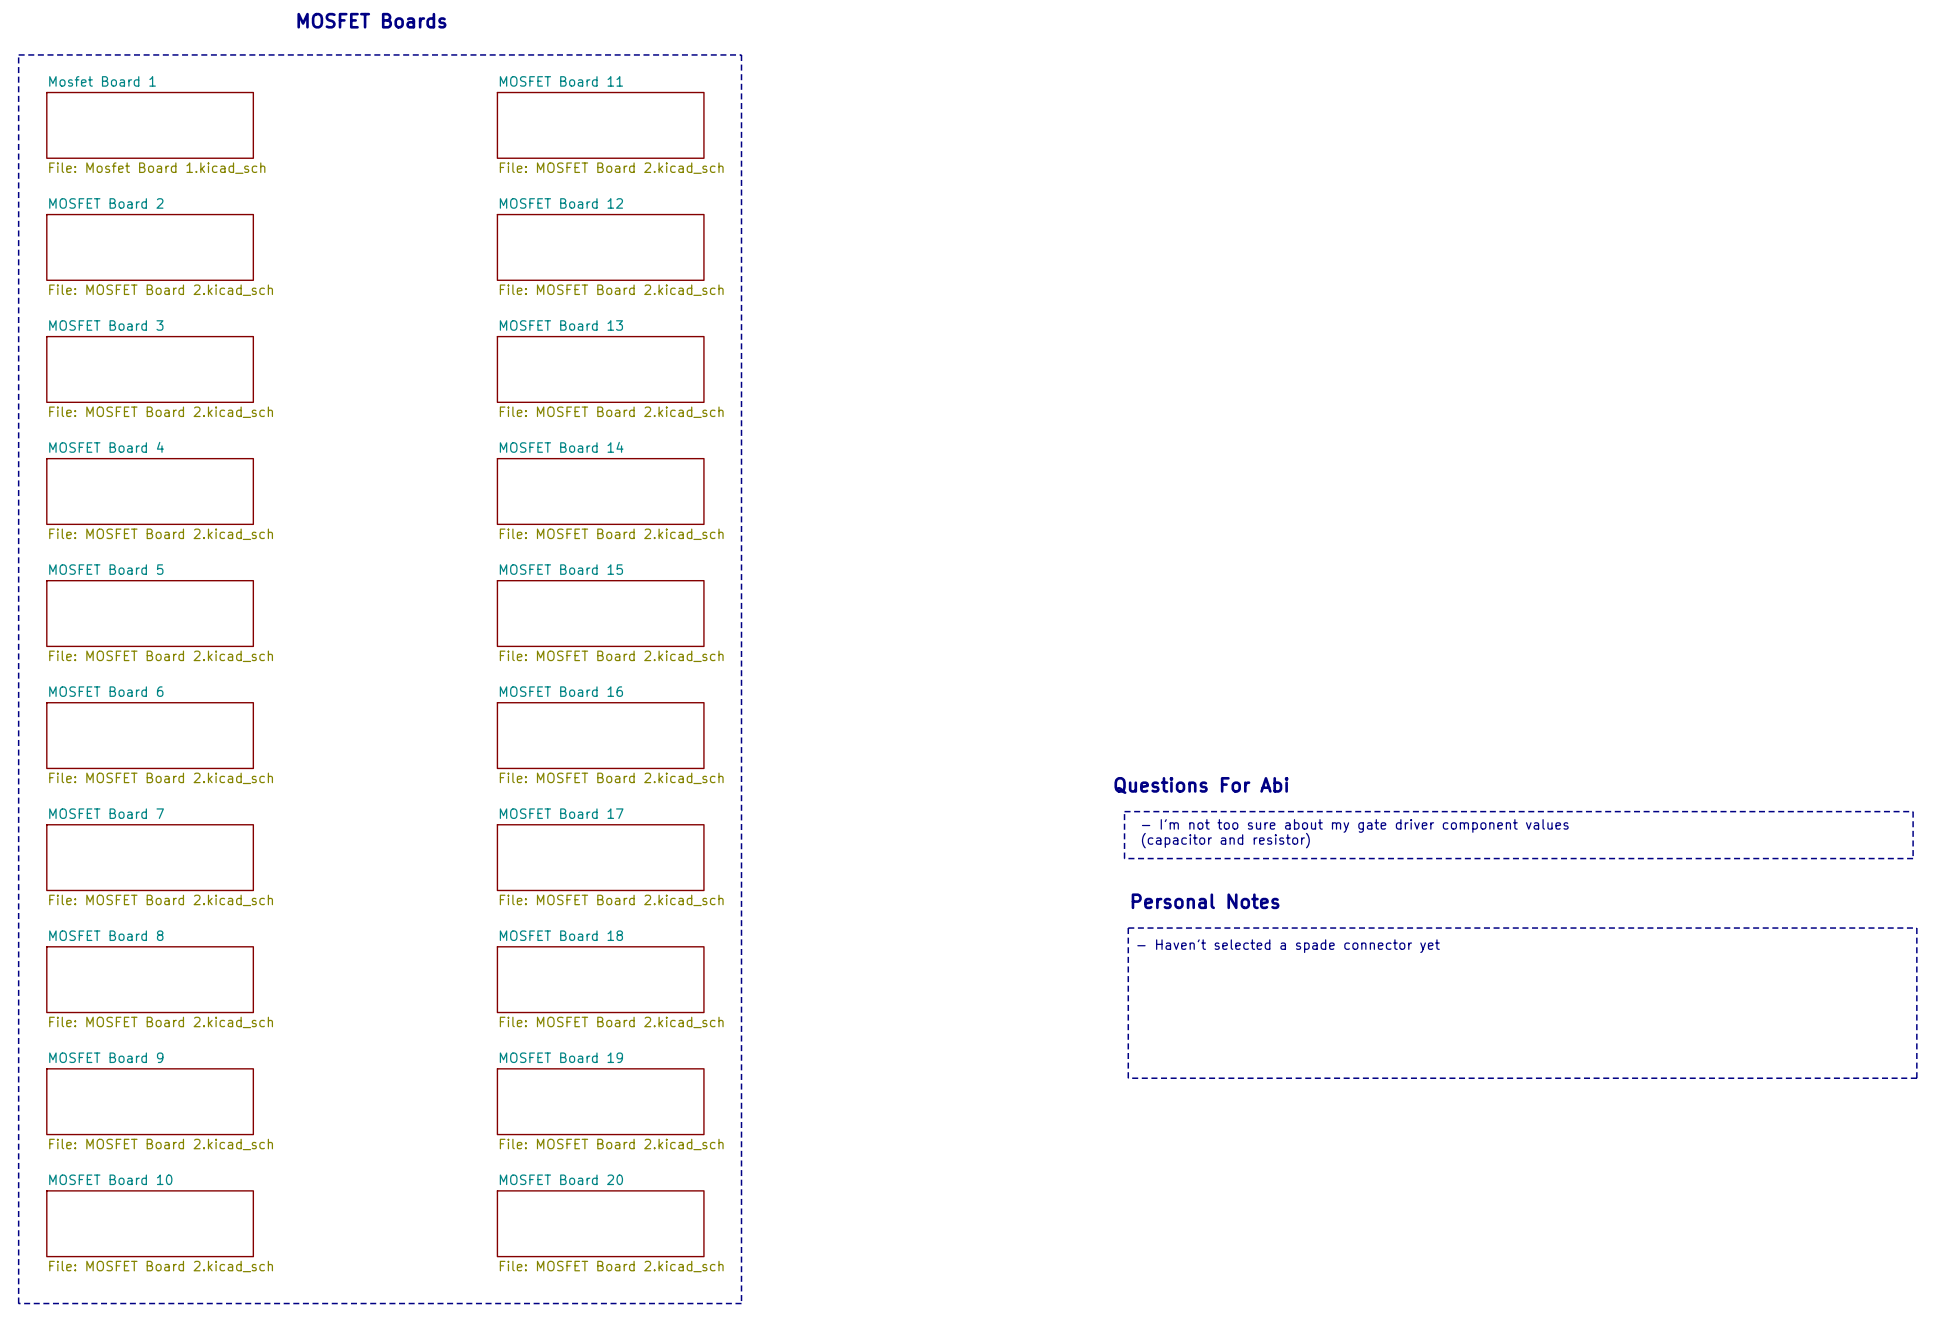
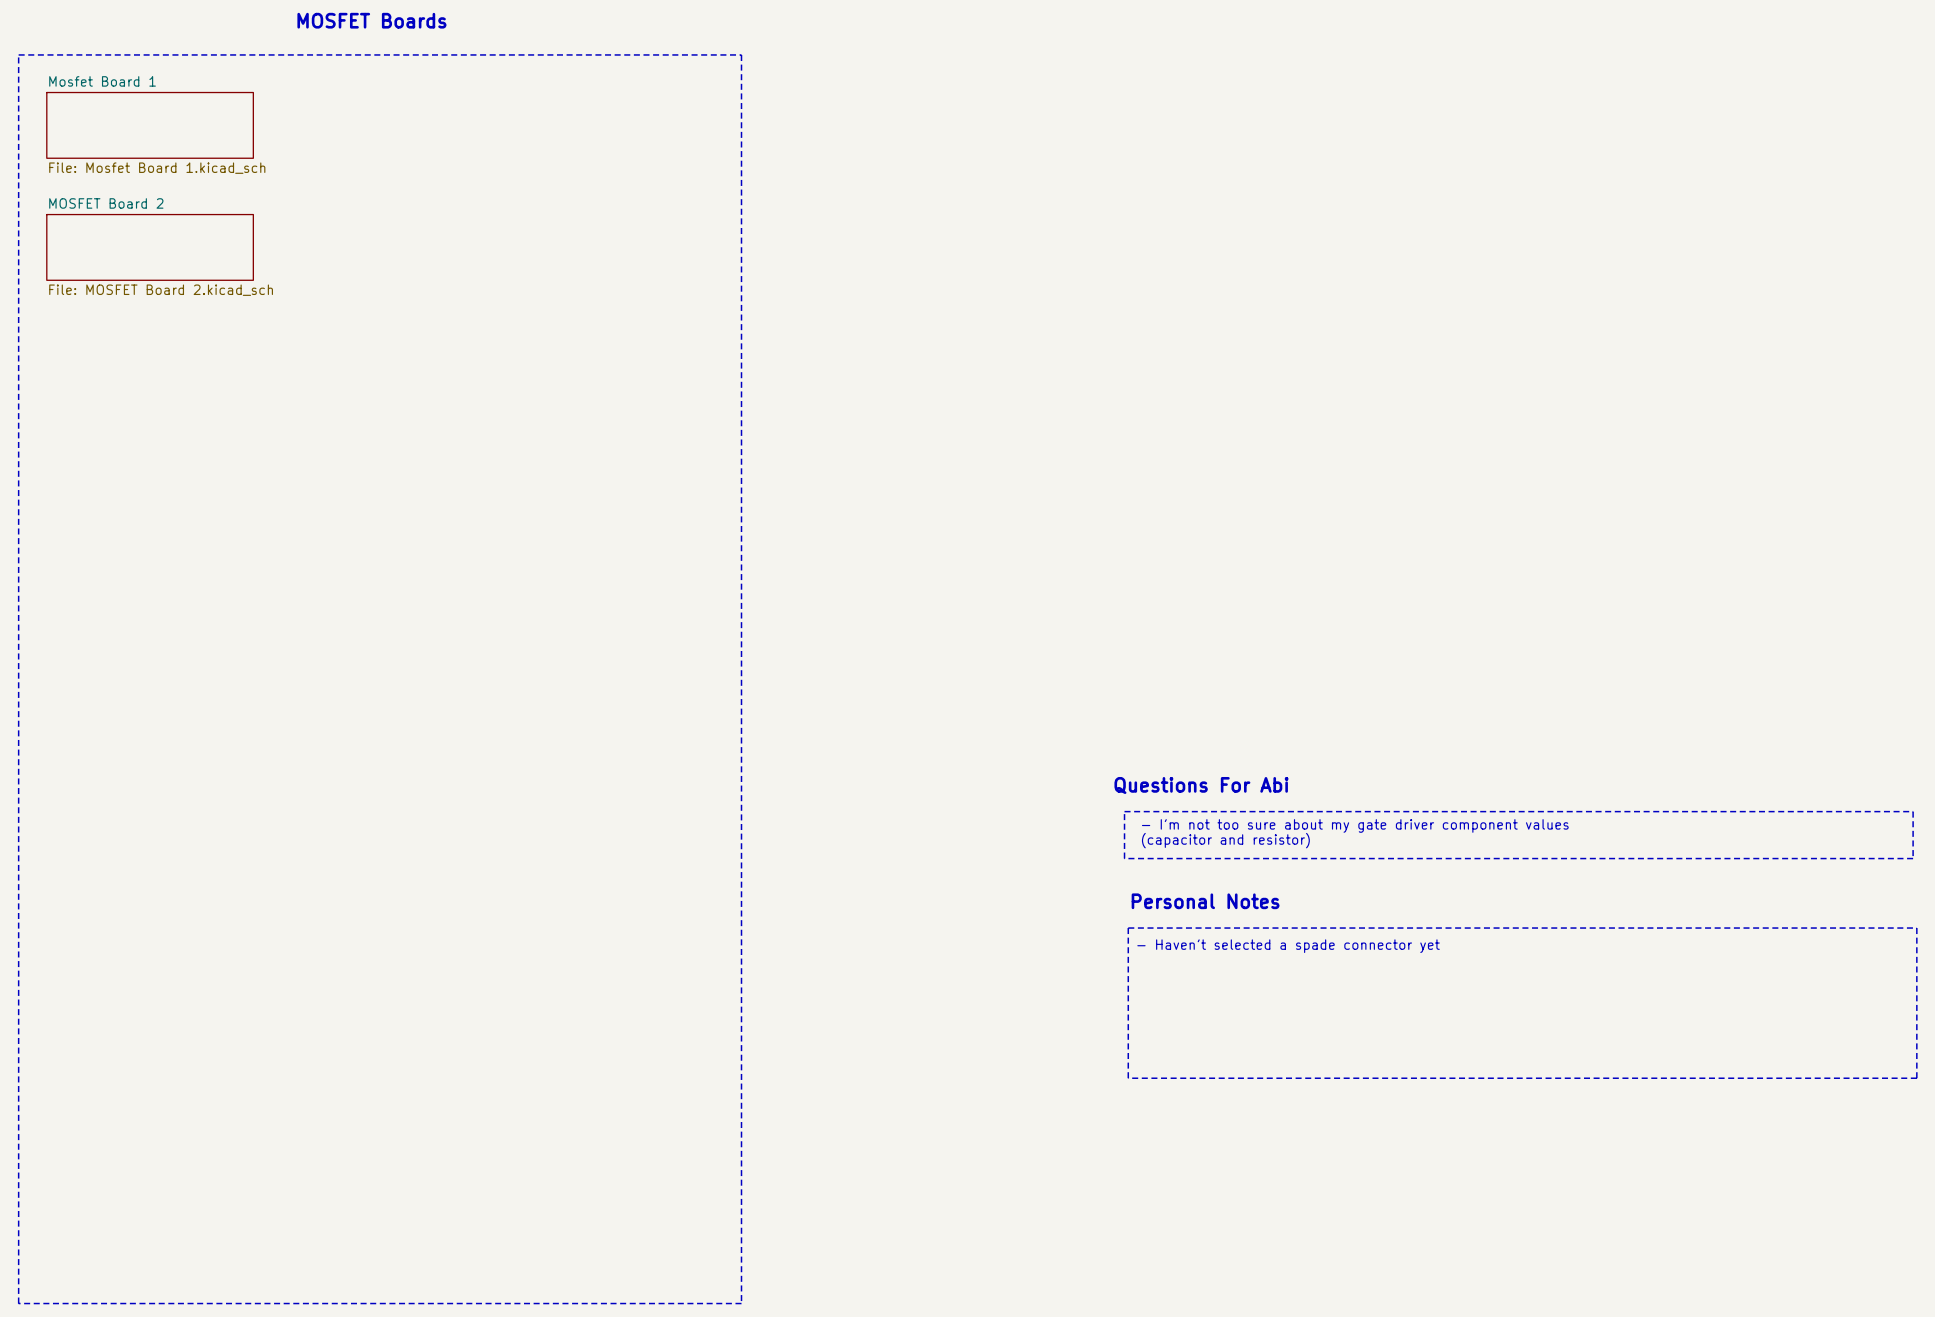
sheet MOSFET Board 11: File: MOSFET Board 2.kicad_sch (600, 125) -> none
sheet MOSFET Board 12: File: MOSFET Board 2.kicad_sch (600, 247) -> none
sheet MOSFET Board 3: File: MOSFET Board 2.kicad_sch (150, 369) -> none
sheet MOSFET Board 13: File: MOSFET Board 2.kicad_sch (600, 369) -> none
sheet MOSFET Board 4: File: MOSFET Board 2.kicad_sch (150, 491) -> none
sheet MOSFET Board 14: File: MOSFET Board 2.kicad_sch (600, 491) -> none
sheet MOSFET Board 5: File: MOSFET Board 2.kicad_sch (150, 613) -> none
sheet MOSFET Board 15: File: MOSFET Board 2.kicad_sch (600, 613) -> none
sheet MOSFET Board 6: File: MOSFET Board 2.kicad_sch (150, 735) -> none
sheet MOSFET Board 16: File: MOSFET Board 2.kicad_sch (600, 735) -> none
sheet MOSFET Board 7: File: MOSFET Board 2.kicad_sch (150, 857) -> none
sheet MOSFET Board 17: File: MOSFET Board 2.kicad_sch (600, 857) -> none
sheet MOSFET Board 8: File: MOSFET Board 2.kicad_sch (150, 979) -> none
sheet MOSFET Board 18: File: MOSFET Board 2.kicad_sch (600, 979) -> none
sheet MOSFET Board 9: File: MOSFET Board 2.kicad_sch (150, 1101) -> none
sheet MOSFET Board 19: File: MOSFET Board 2.kicad_sch (600, 1101) -> none
sheet MOSFET Board 10: File: MOSFET Board 2.kicad_sch (150, 1223) -> none
sheet MOSFET Board 20: File: MOSFET Board 2.kicad_sch (600, 1223) -> none

